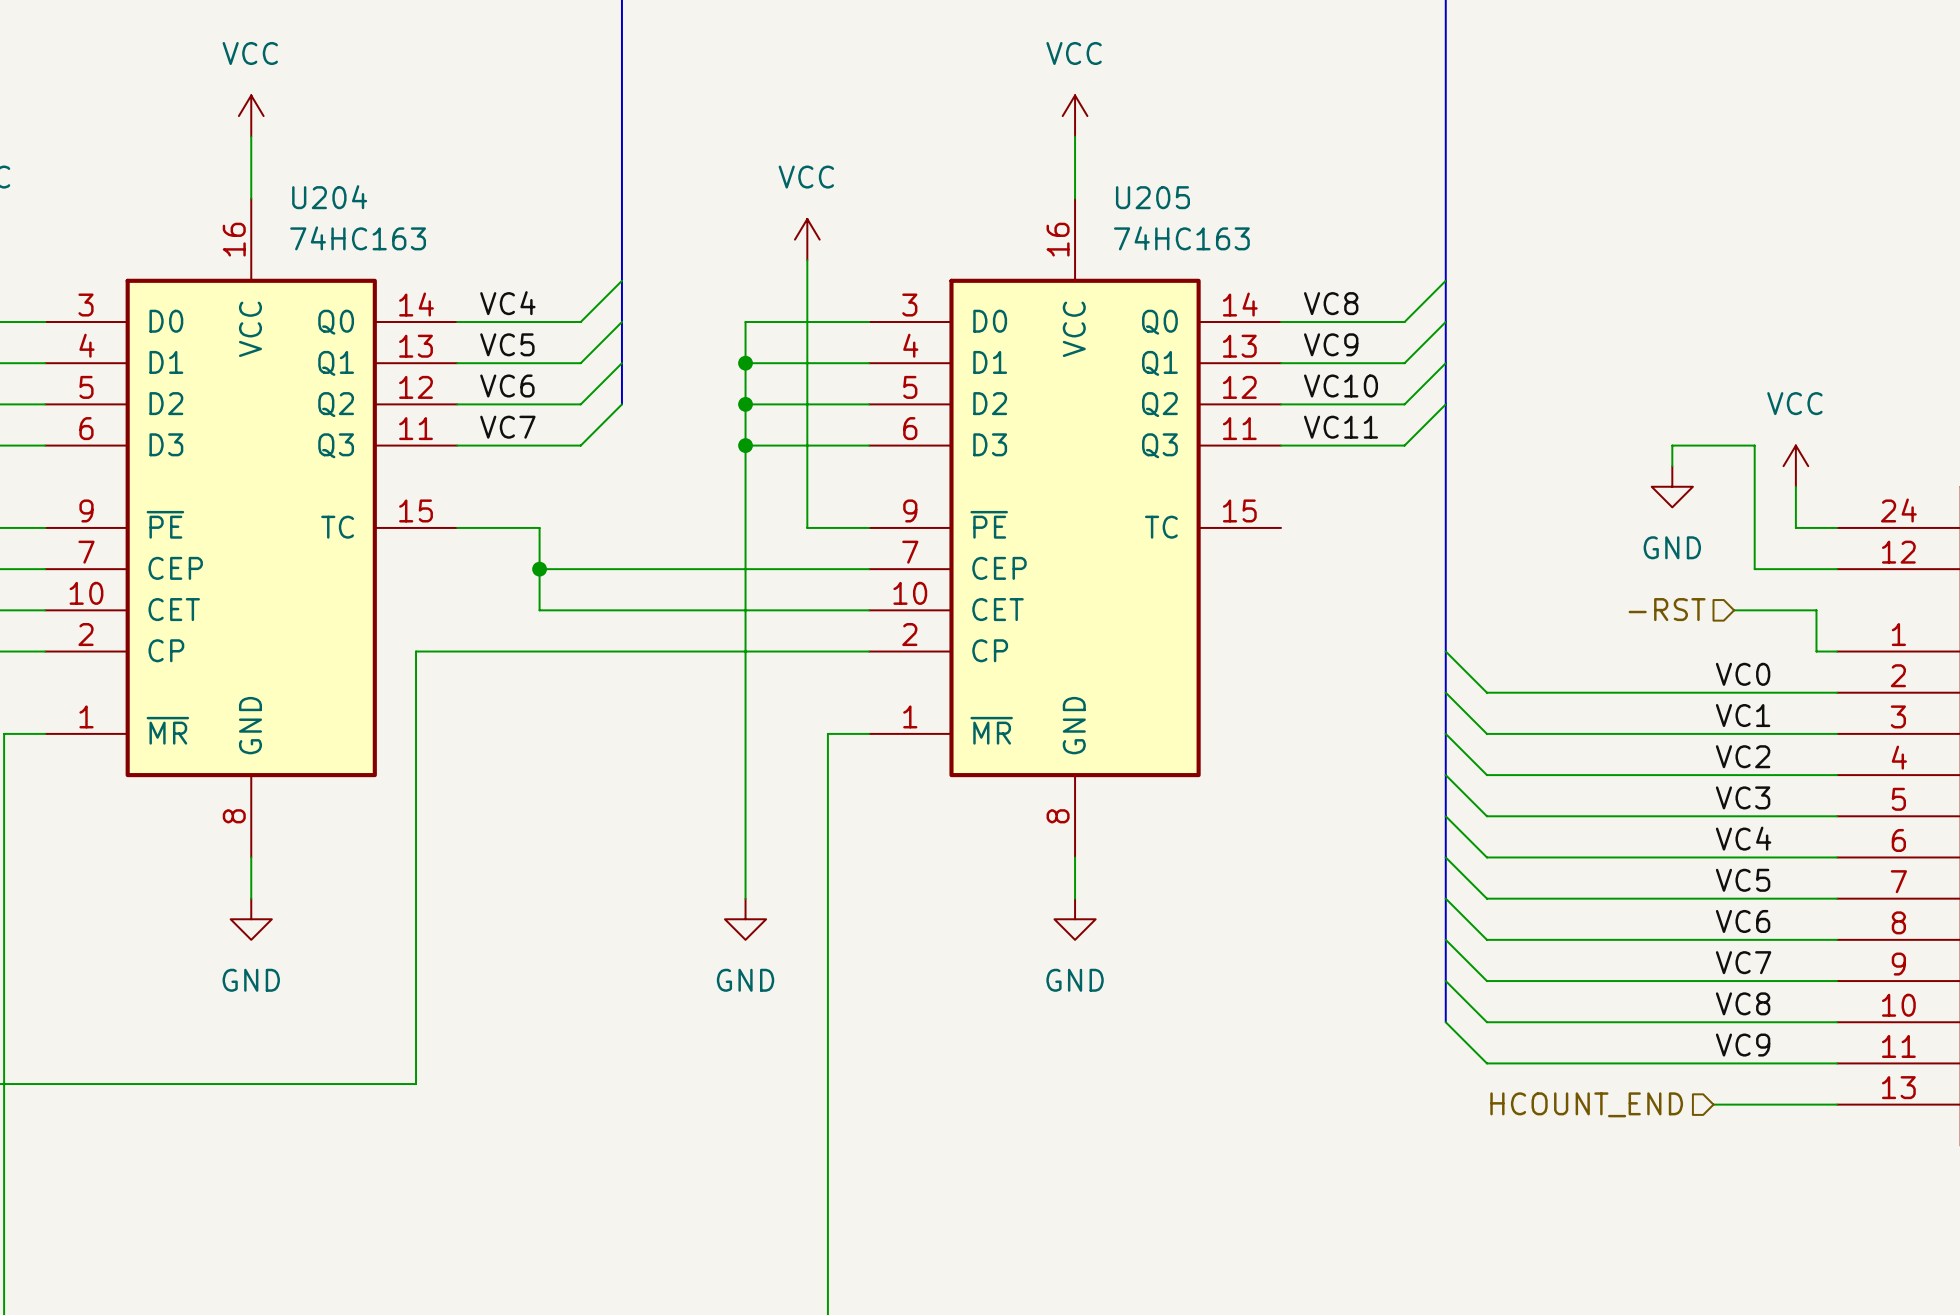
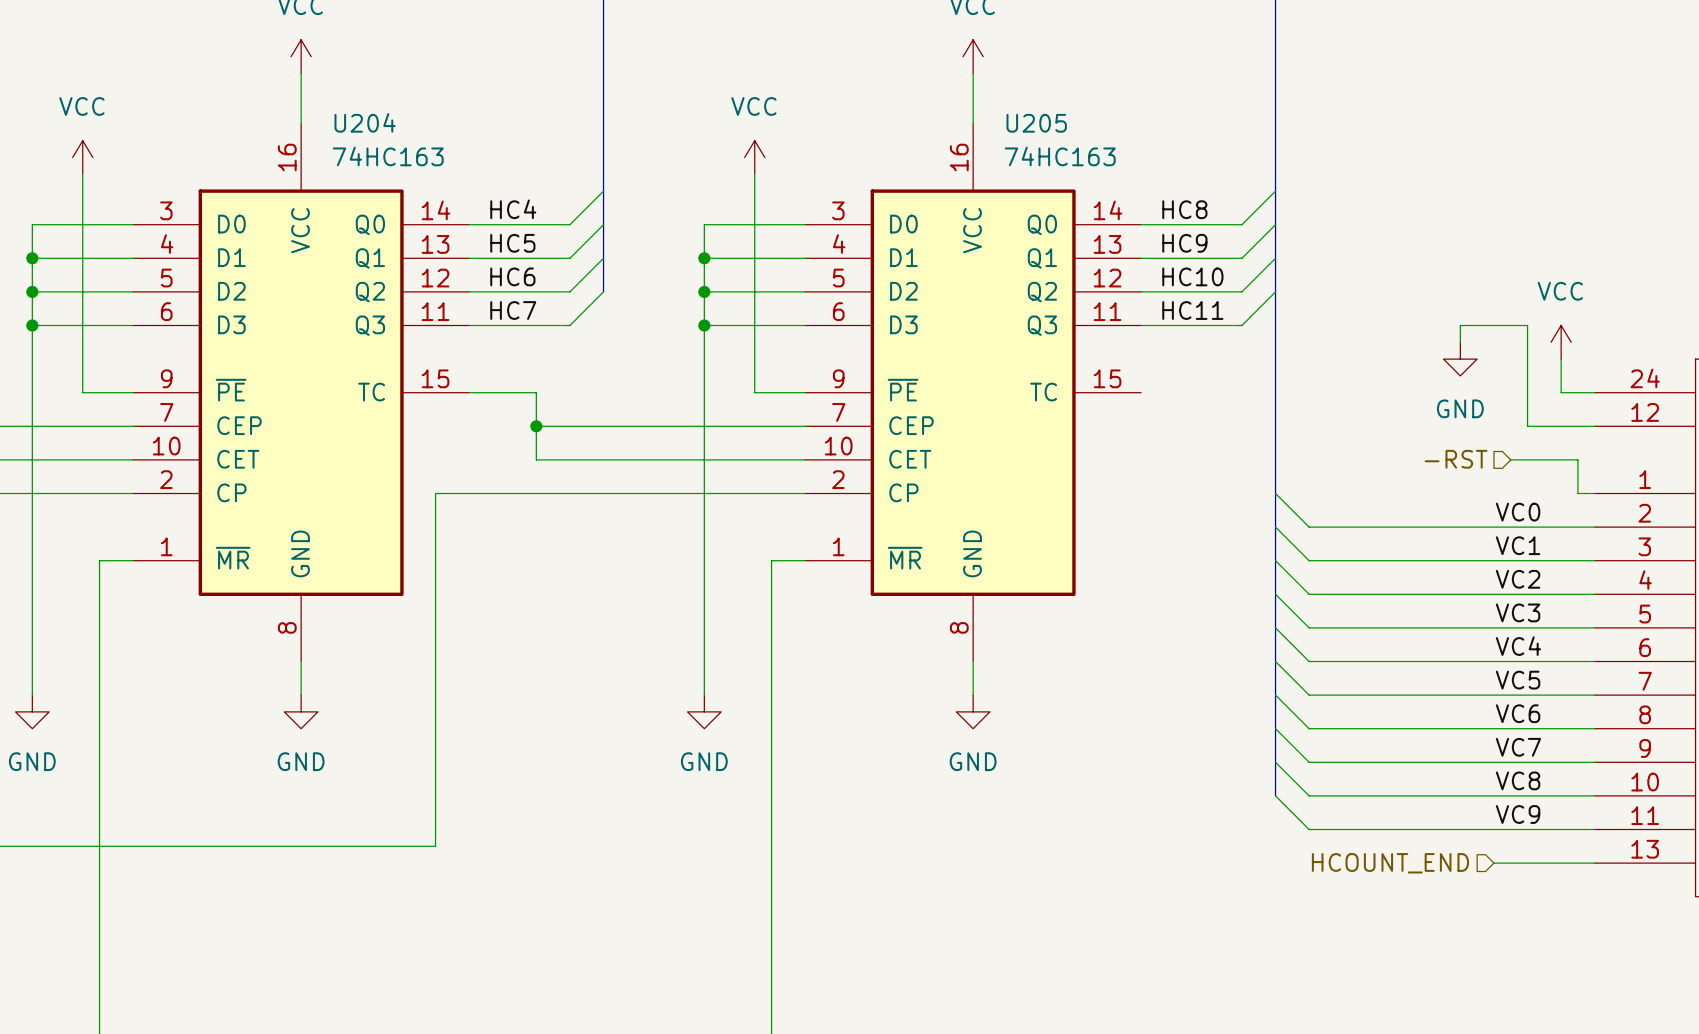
label: VC4 (507, 303) -> HC4 (513, 209)
label: VC8 (1331, 303) -> HC8 (1184, 209)
label: VC5 (507, 344) -> HC5 (512, 243)
label: VC9 (1331, 344) -> HC9 (1184, 243)
label: VC6 (507, 386) -> HC6 (512, 276)
label: VC10 (1340, 386) -> HC10 (1192, 276)
label: VC7 (507, 427) -> HC7 (513, 310)
label: VC11 (1340, 427) -> HC11 (1192, 310)

